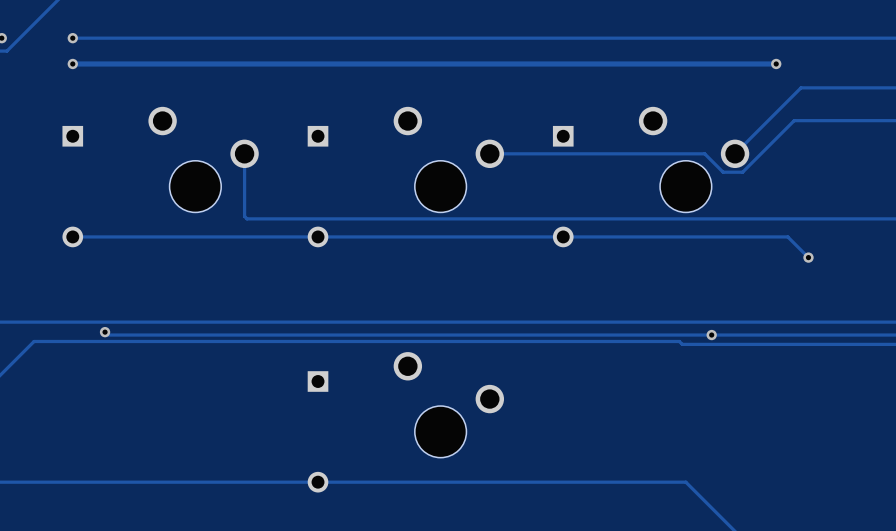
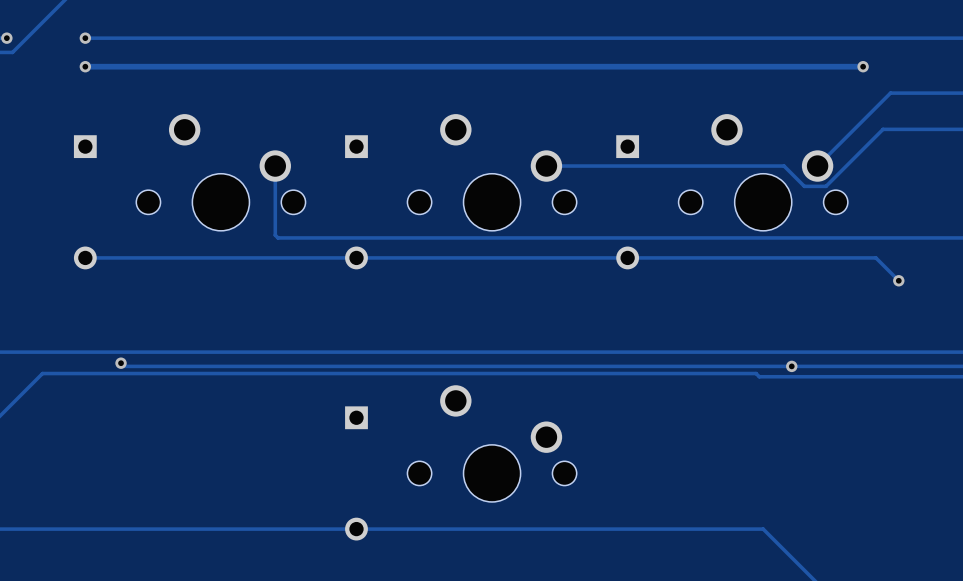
part footprint: [148, 106, 259, 213] -> [136, 114, 306, 231]
part footprint: [393, 106, 505, 213] -> [407, 114, 577, 231]
part footprint: [638, 106, 750, 213] -> [678, 114, 848, 231]
part footprint: [393, 352, 505, 458] -> [407, 385, 577, 502]

